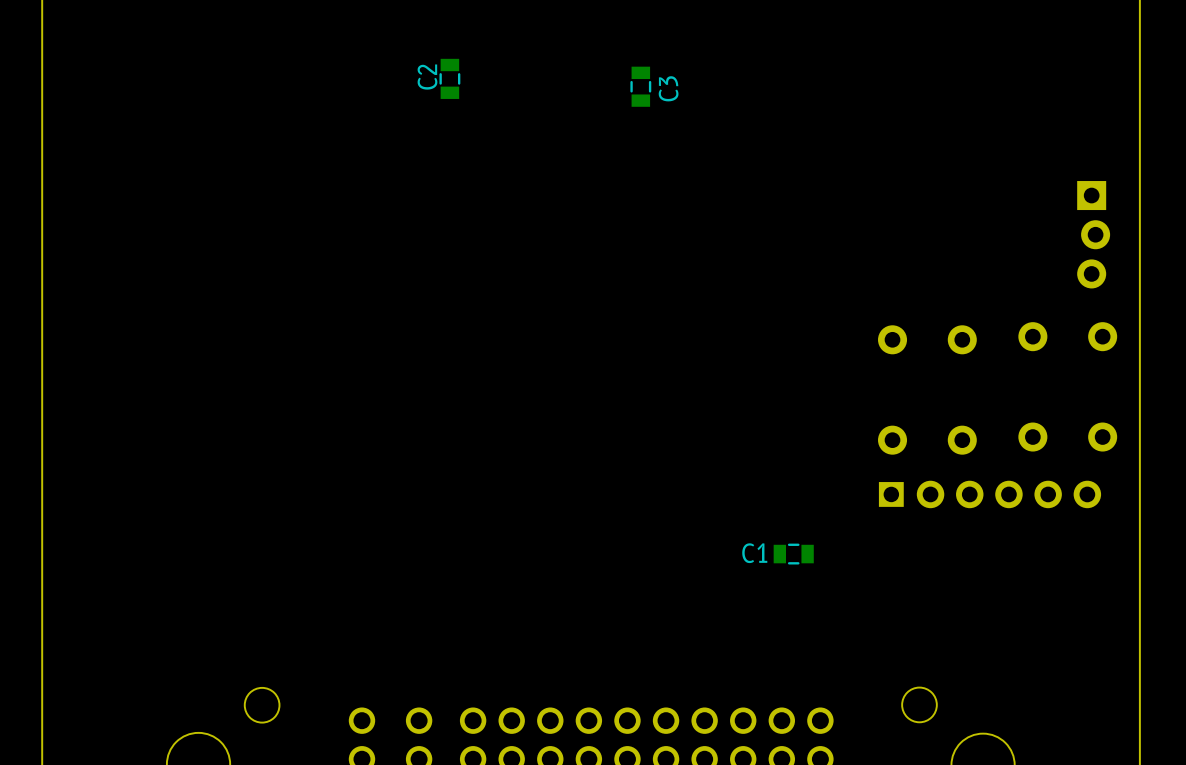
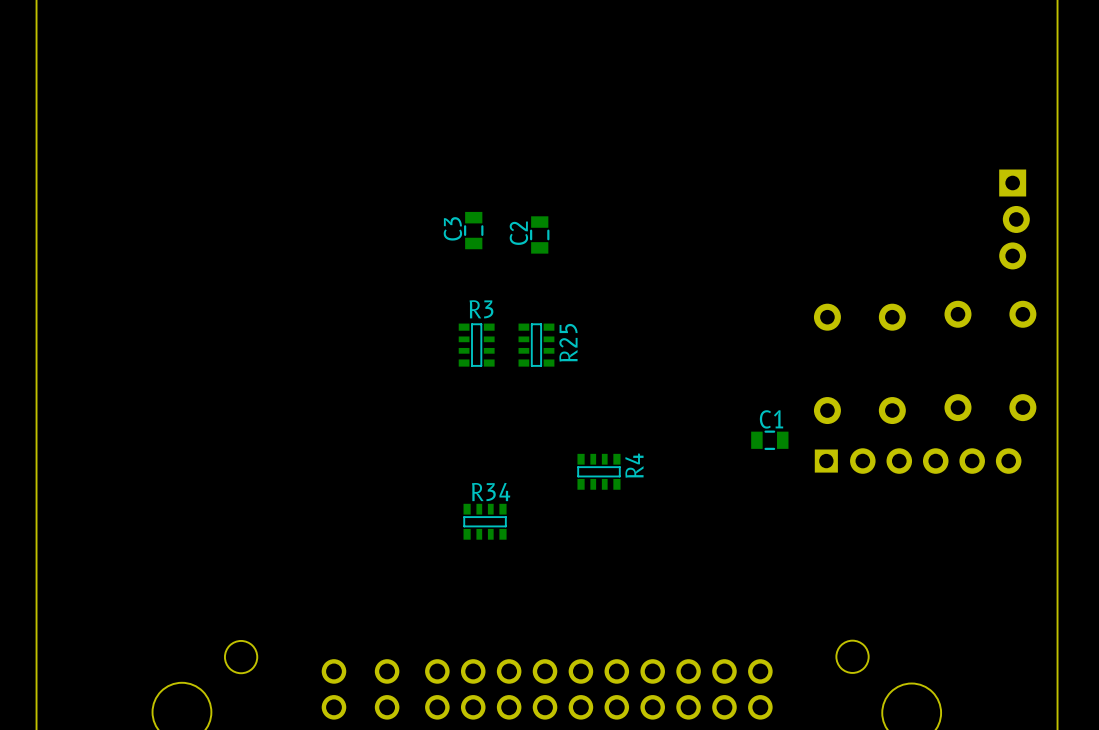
C2 position: (449, 78) -> (539, 234)
C3 position: (640, 86) -> (473, 230)
C3 name position: C3 (668, 88) -> C3 (452, 228)
R3: none -> (476, 345)
R25: none -> (536, 345)
R4: none -> (598, 471)
C1 name position: C1 (754, 553) -> C1 (771, 419)
C1 position: (793, 554) -> (769, 440)
R34: none -> (485, 521)

